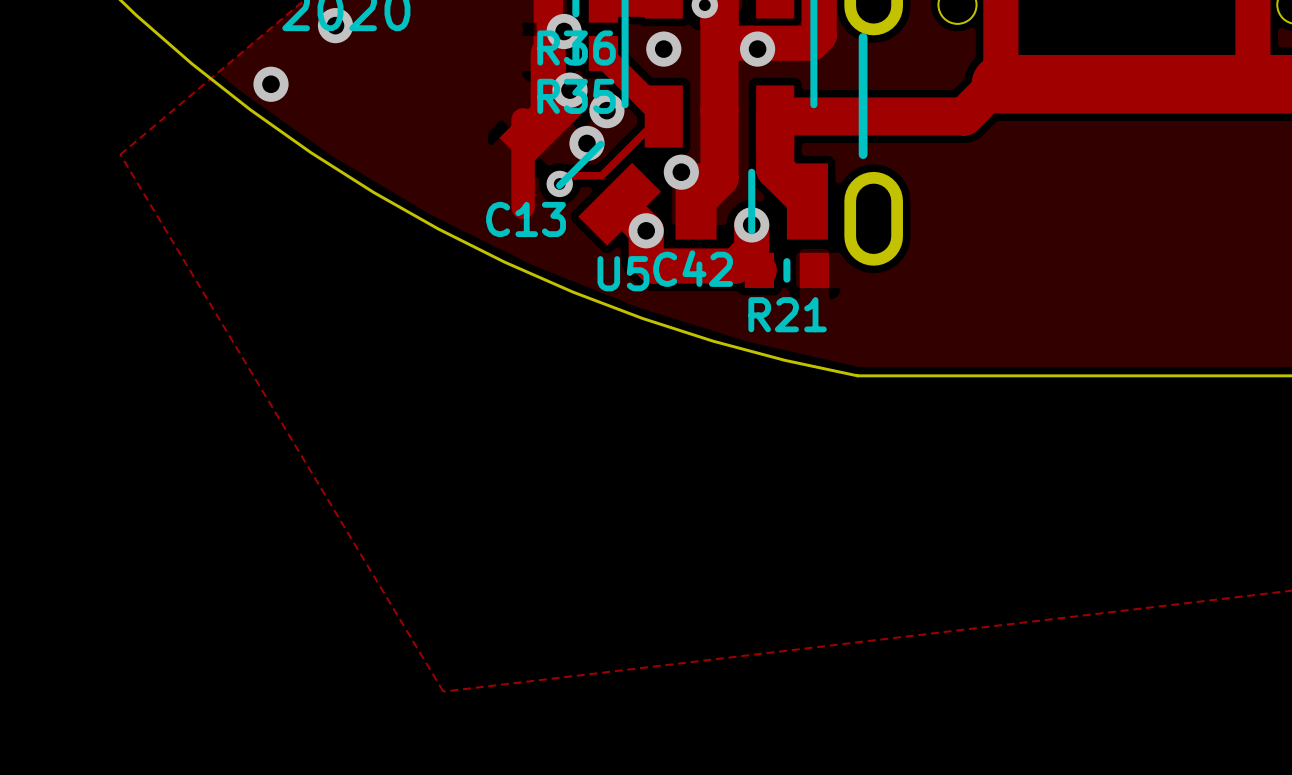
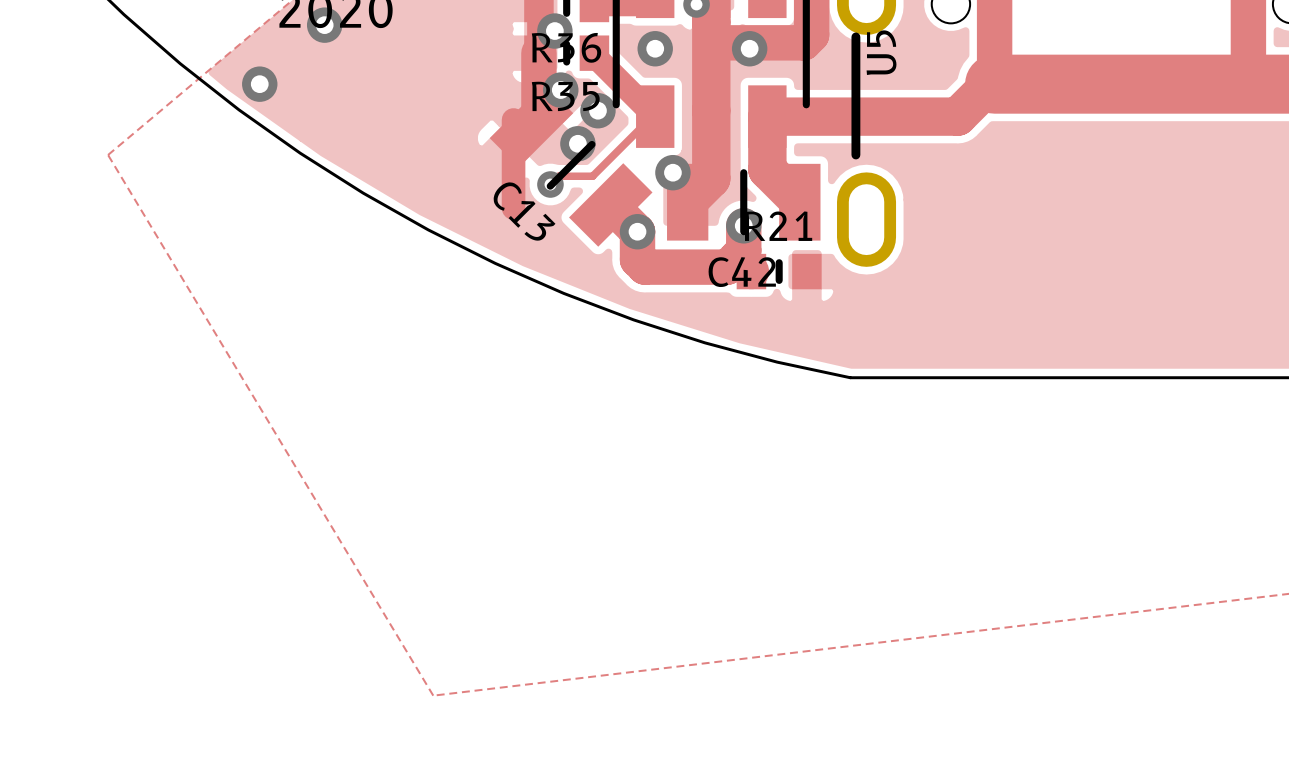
C13 name rotation: 0° (526, 219) -> 45° clockwise (524, 211)
C42 name position: C42 (693, 268) -> C42 (742, 272)
U5 name rotation: 0° (623, 273) -> 90° counterclockwise (881, 52)
U5 name position: U5 (623, 273) -> U5 (881, 52)
R21 name position: R21 (787, 314) -> R21 (778, 226)

